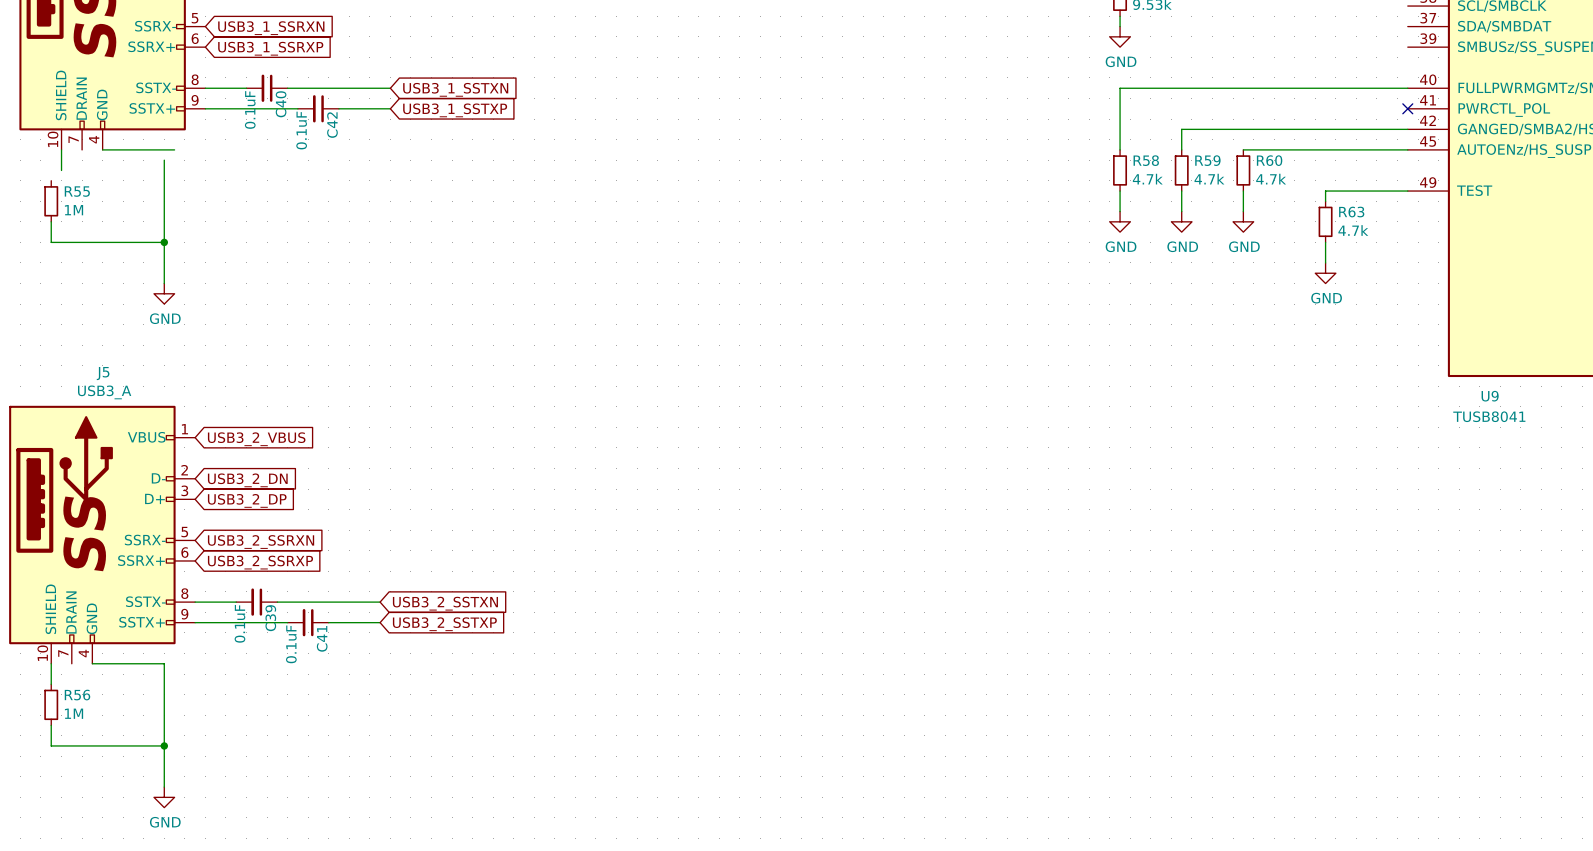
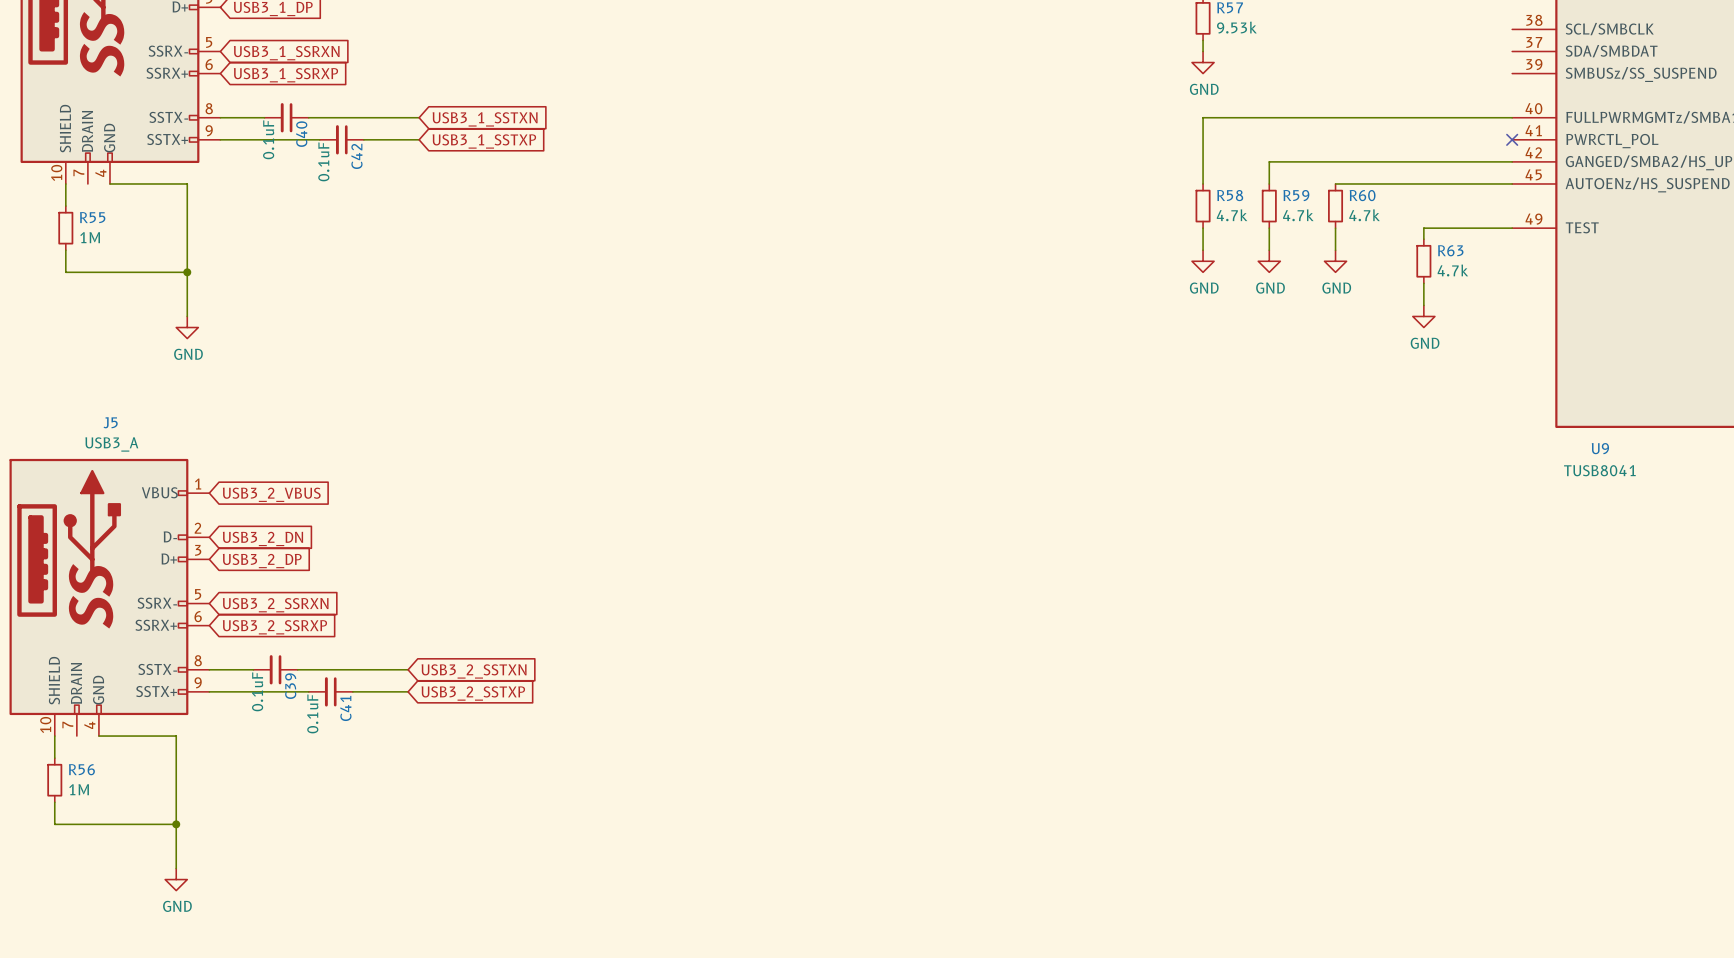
wire: (164, 160) (164, 283) -> (187, 183) (187, 316)
R55 position: (51, 201) -> (65, 228)
wire: (51, 221) (51, 242) (164, 242) -> (65, 250) (65, 272) (187, 272)
junction position: (164, 242) -> (187, 272)
power symbol position: GND (164, 293) -> GND (187, 327)

